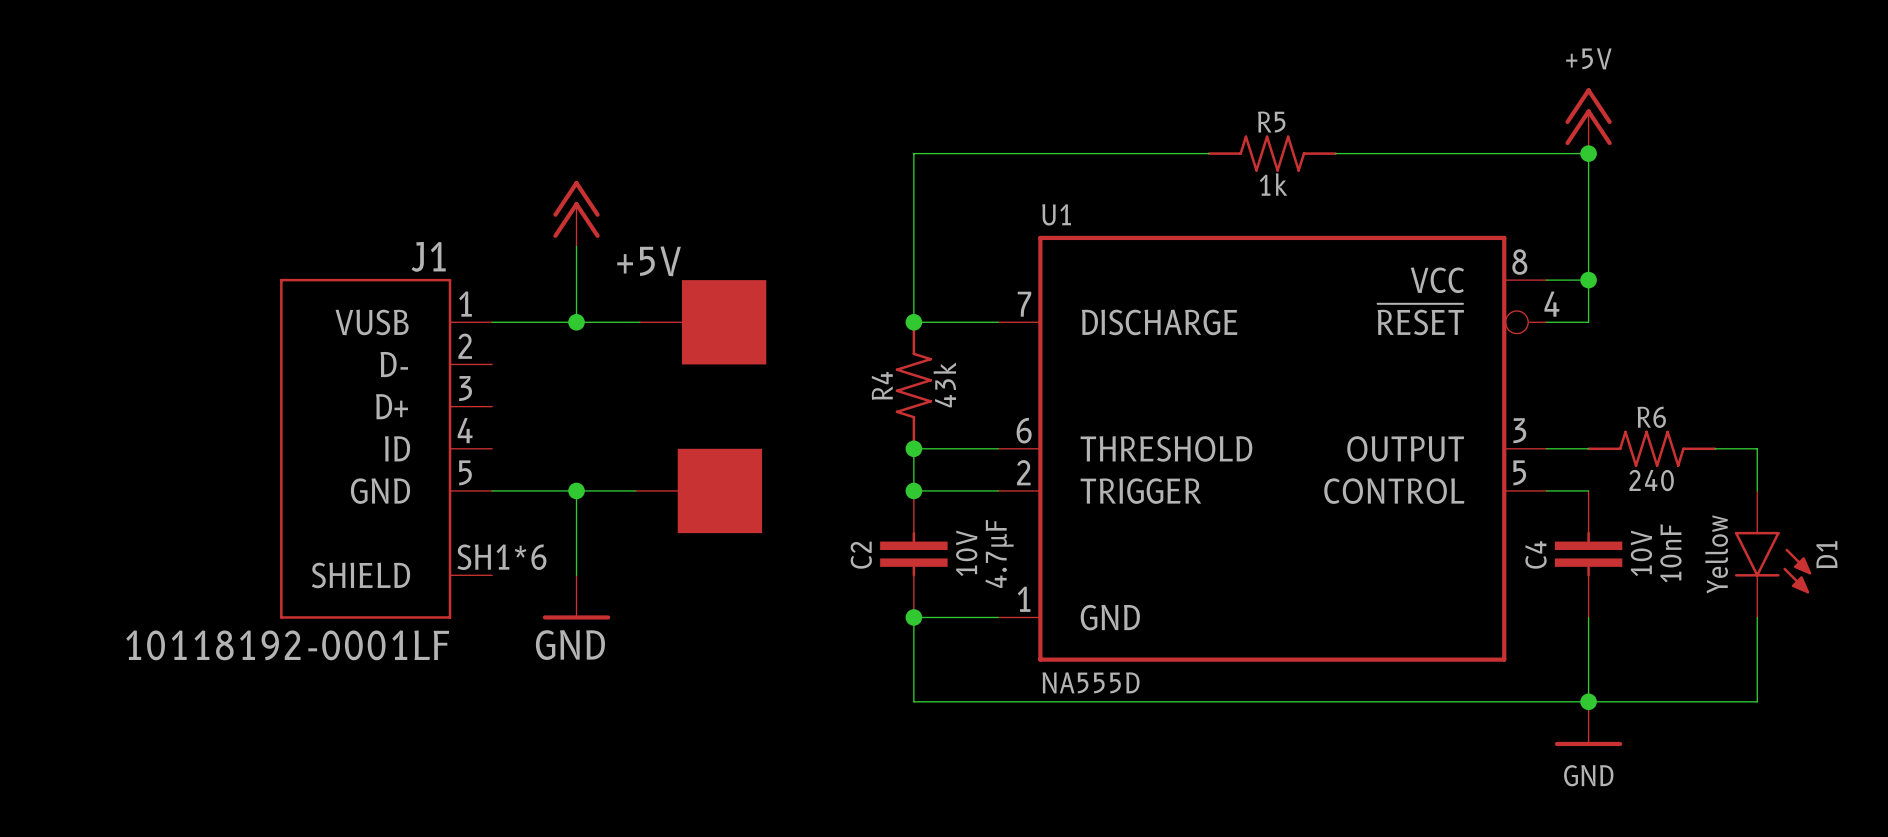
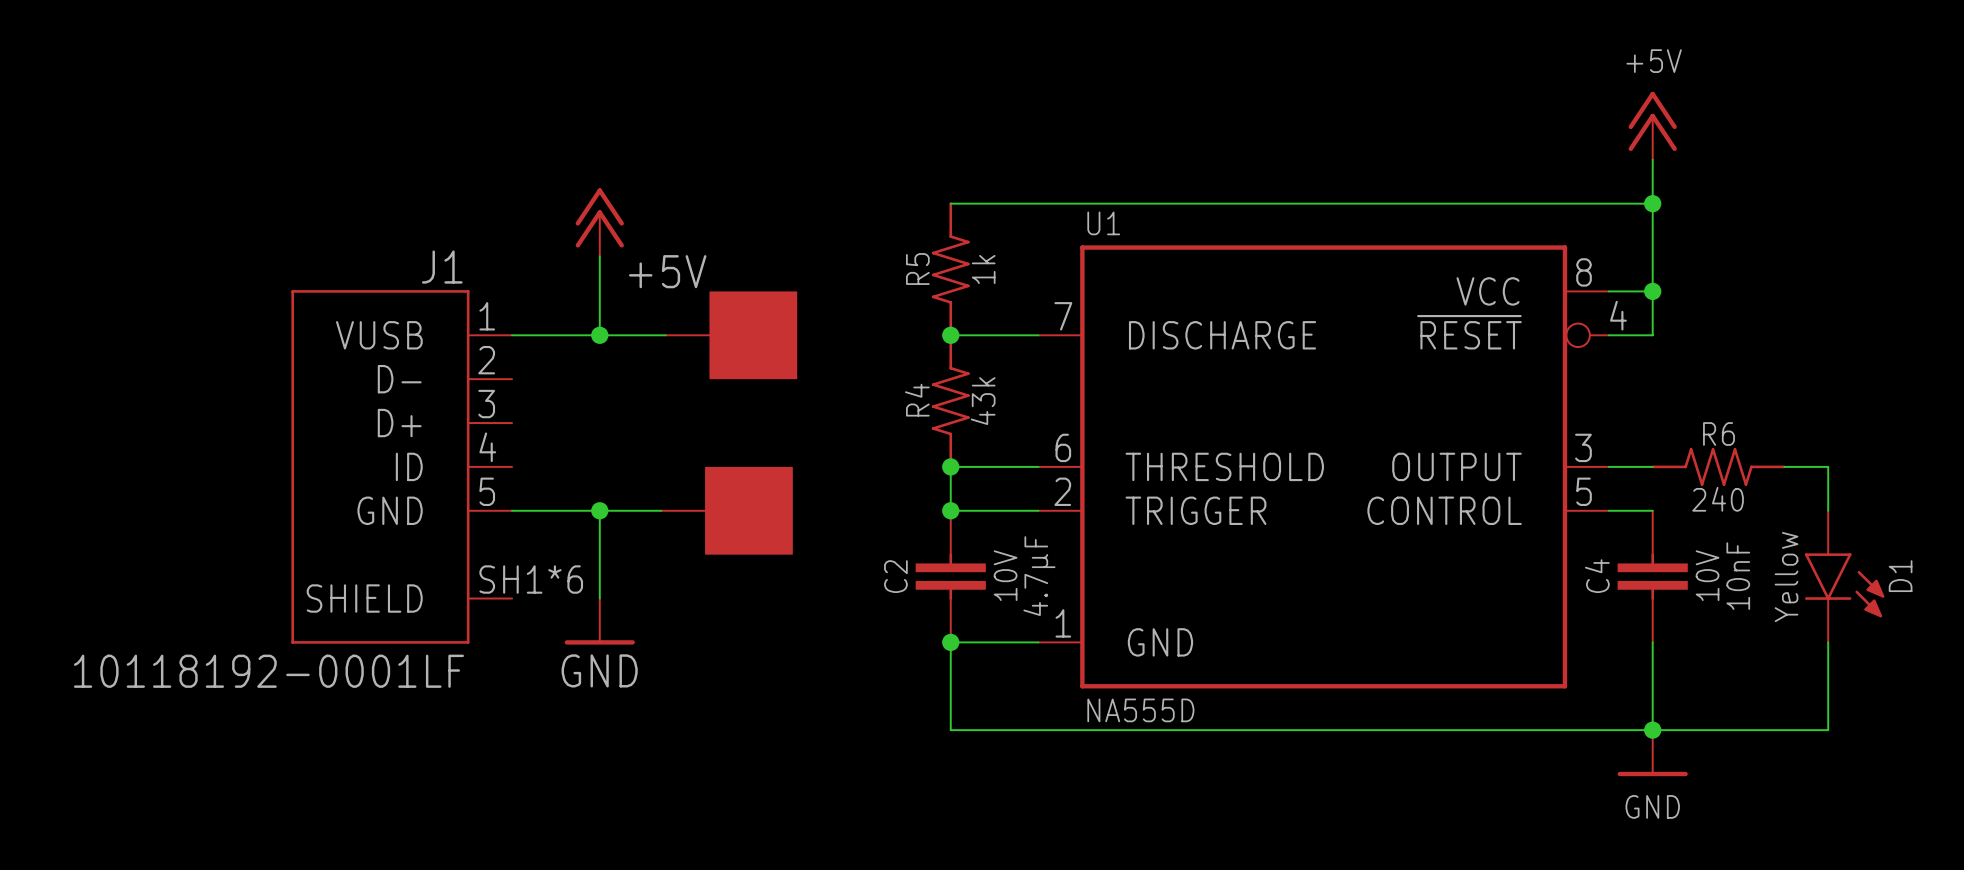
R5 name position: R5 (1271, 122) -> R5 (917, 269)
wire: (1209, 153) (913, 153) (913, 322) -> none
R5 rotation: 0° (1272, 153) -> 90° clockwise (950, 269)
R5 position: (1272, 153) -> (950, 269)
wire: (1335, 153) (1588, 153) -> none
junction position: (1588, 153) -> (1652, 203)
R5 text position: 1k (1273, 184) -> 1k (983, 269)
wire: none -> (950, 203) (1652, 203)

